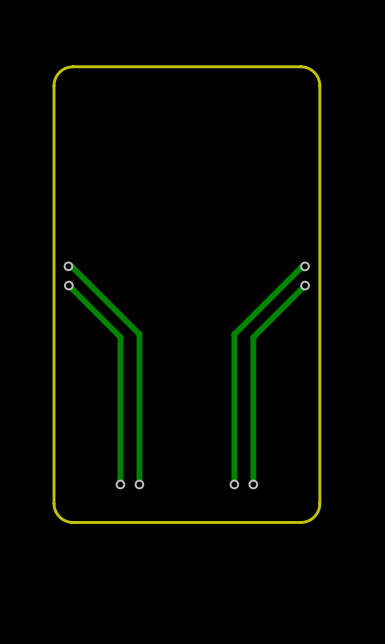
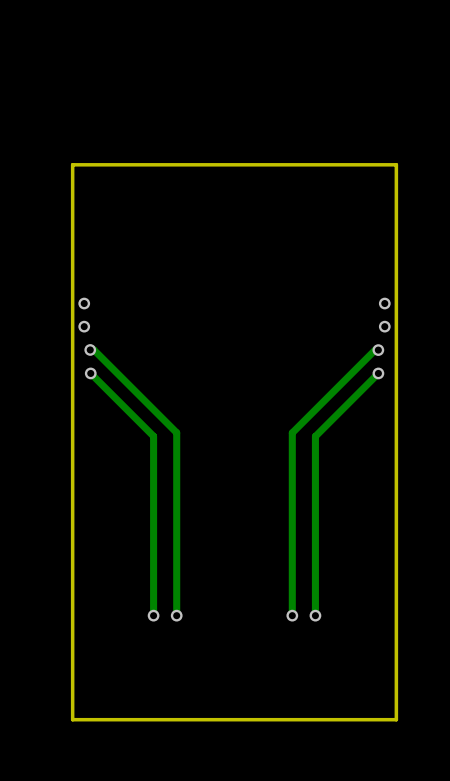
board edge: (319, 114) (318, 78) (312, 70) (300, 66) (70, 66) (61, 70) (55, 78) (53, 114) -> (396, 164) (72, 164)
via: none -> (84, 303)
via: none -> (384, 303)
via: none -> (84, 326)
via: none -> (384, 326)
board edge: (319, 503) (314, 516) (300, 522) (70, 522) (59, 516) (53, 503) -> (396, 638) (396, 719) (72, 719) (72, 638)

